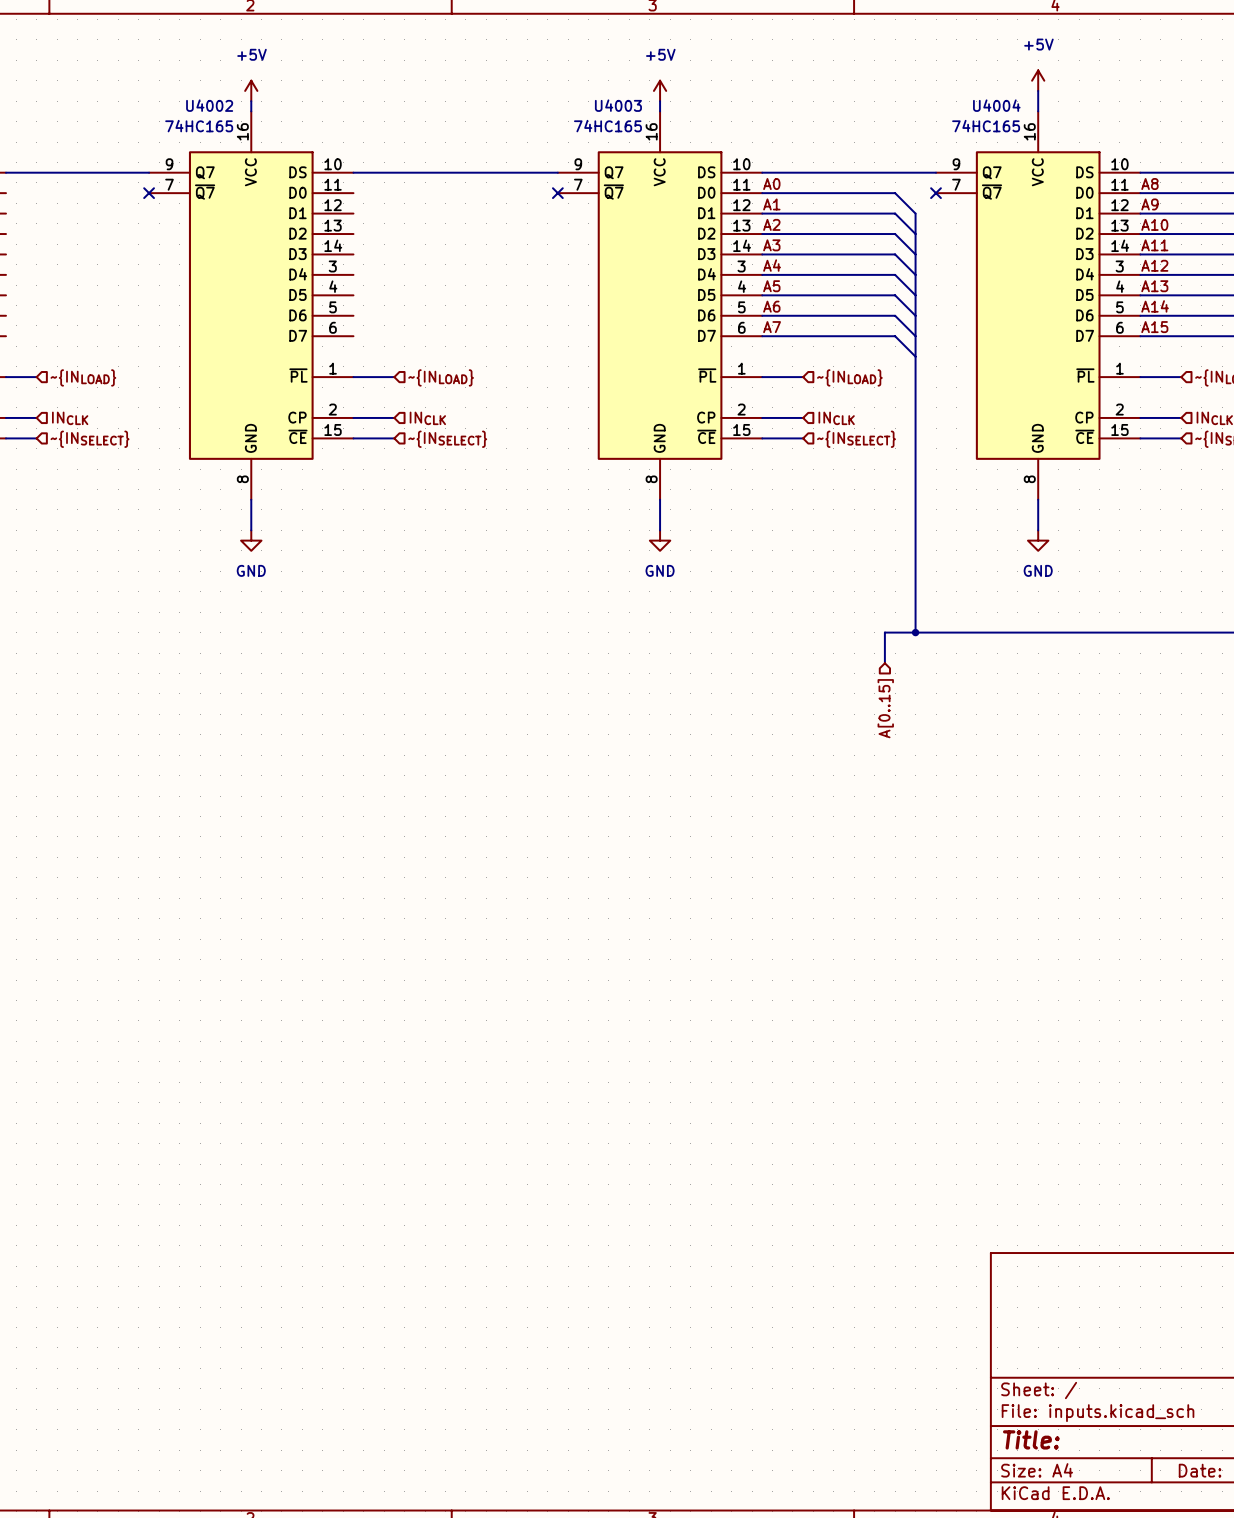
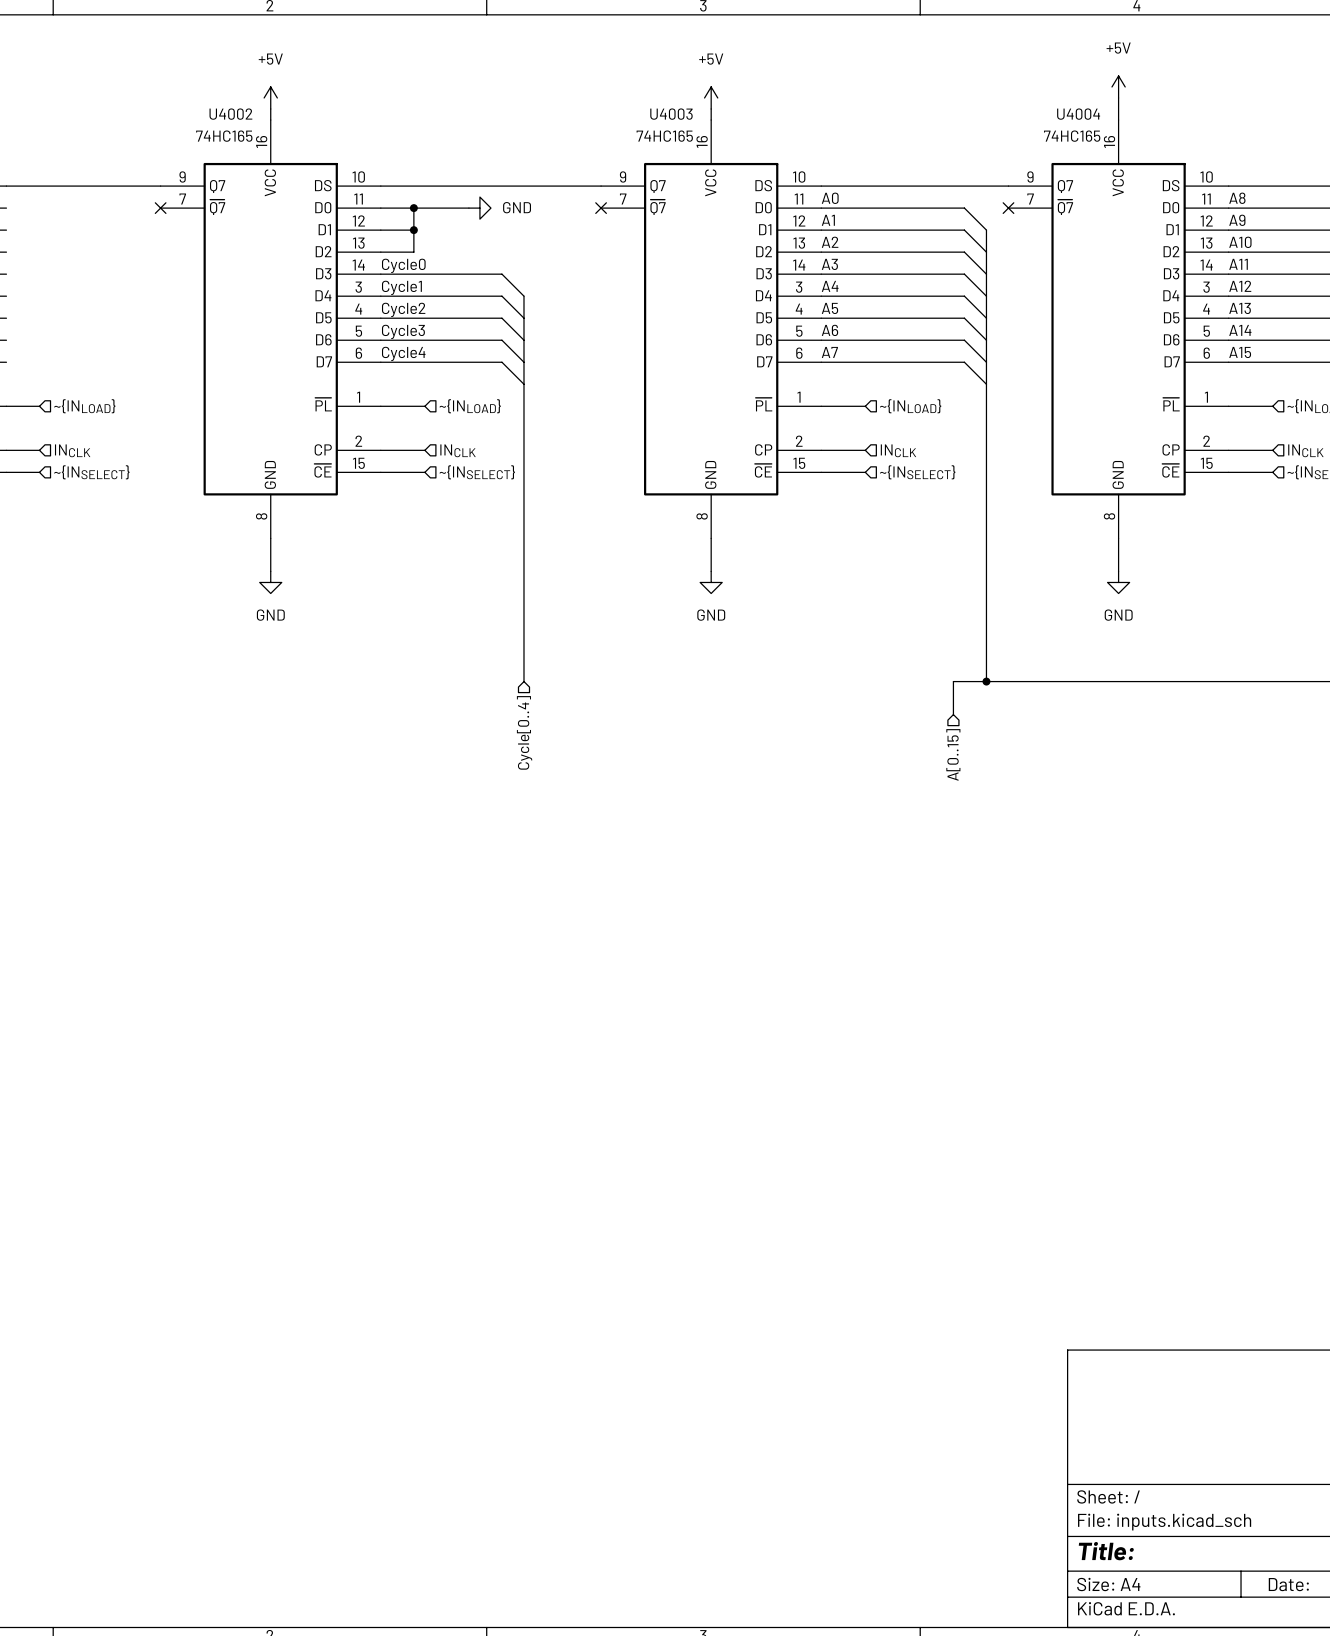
wire: none -> (380, 208) (468, 208)
wire: none -> (413, 208) (413, 252) (380, 252)
junction: none -> (413, 208)
power symbol: none -> GND (479, 208)
wire: none -> (380, 230) (413, 230)
junction: none -> (413, 230)
label: none -> Cycle0 (403, 265)
wire: none -> (380, 274) (501, 274) (523, 296)
label: none -> Cycle1 (401, 287)
wire: none -> (380, 296) (501, 296) (523, 318)
bus: none -> (523, 296) (523, 681)
label: none -> Cycle2 (403, 309)
wire: none -> (380, 318) (501, 318) (523, 340)
label: none -> Cycle3 (403, 331)
wire: none -> (380, 340) (501, 340) (523, 362)
label: none -> Cycle4 (403, 353)
wire: none -> (380, 362) (501, 362) (523, 384)
hierarchical label: none -> Cycle[0..4] (524, 732)

